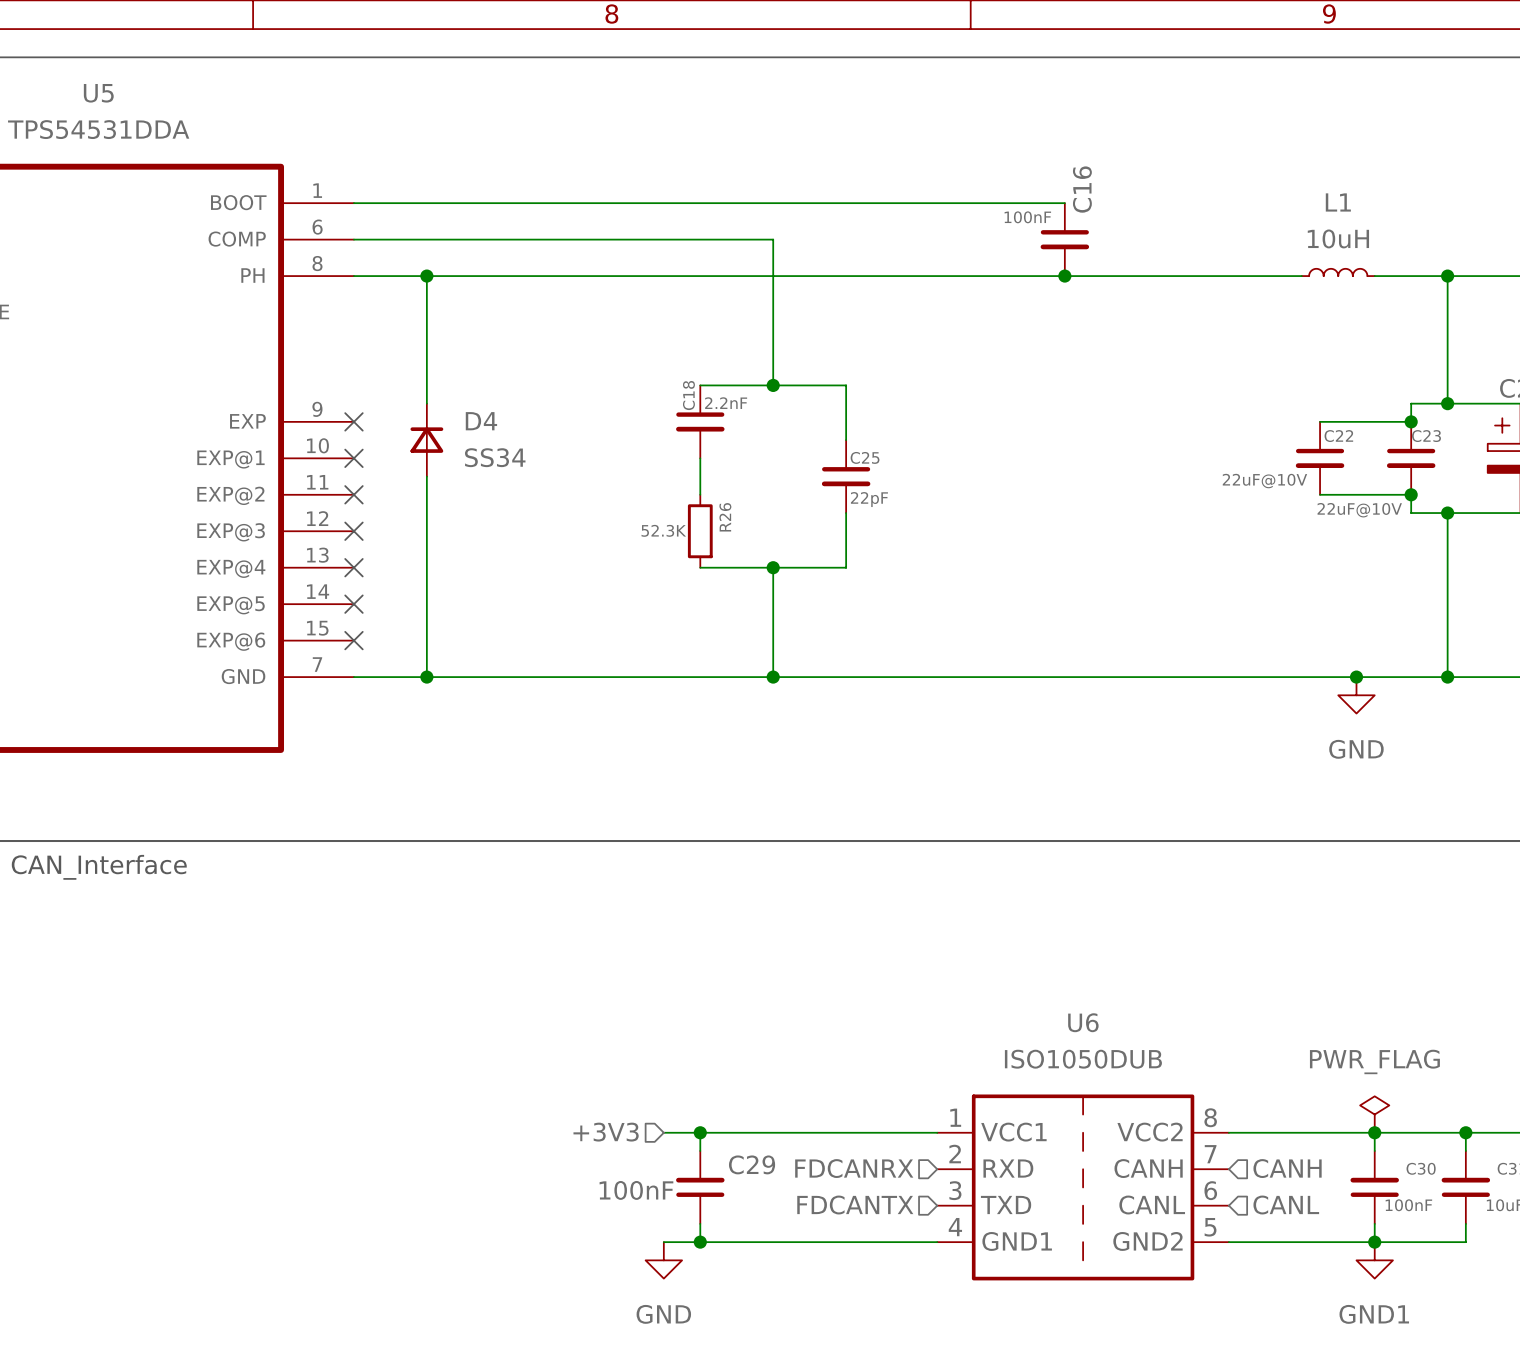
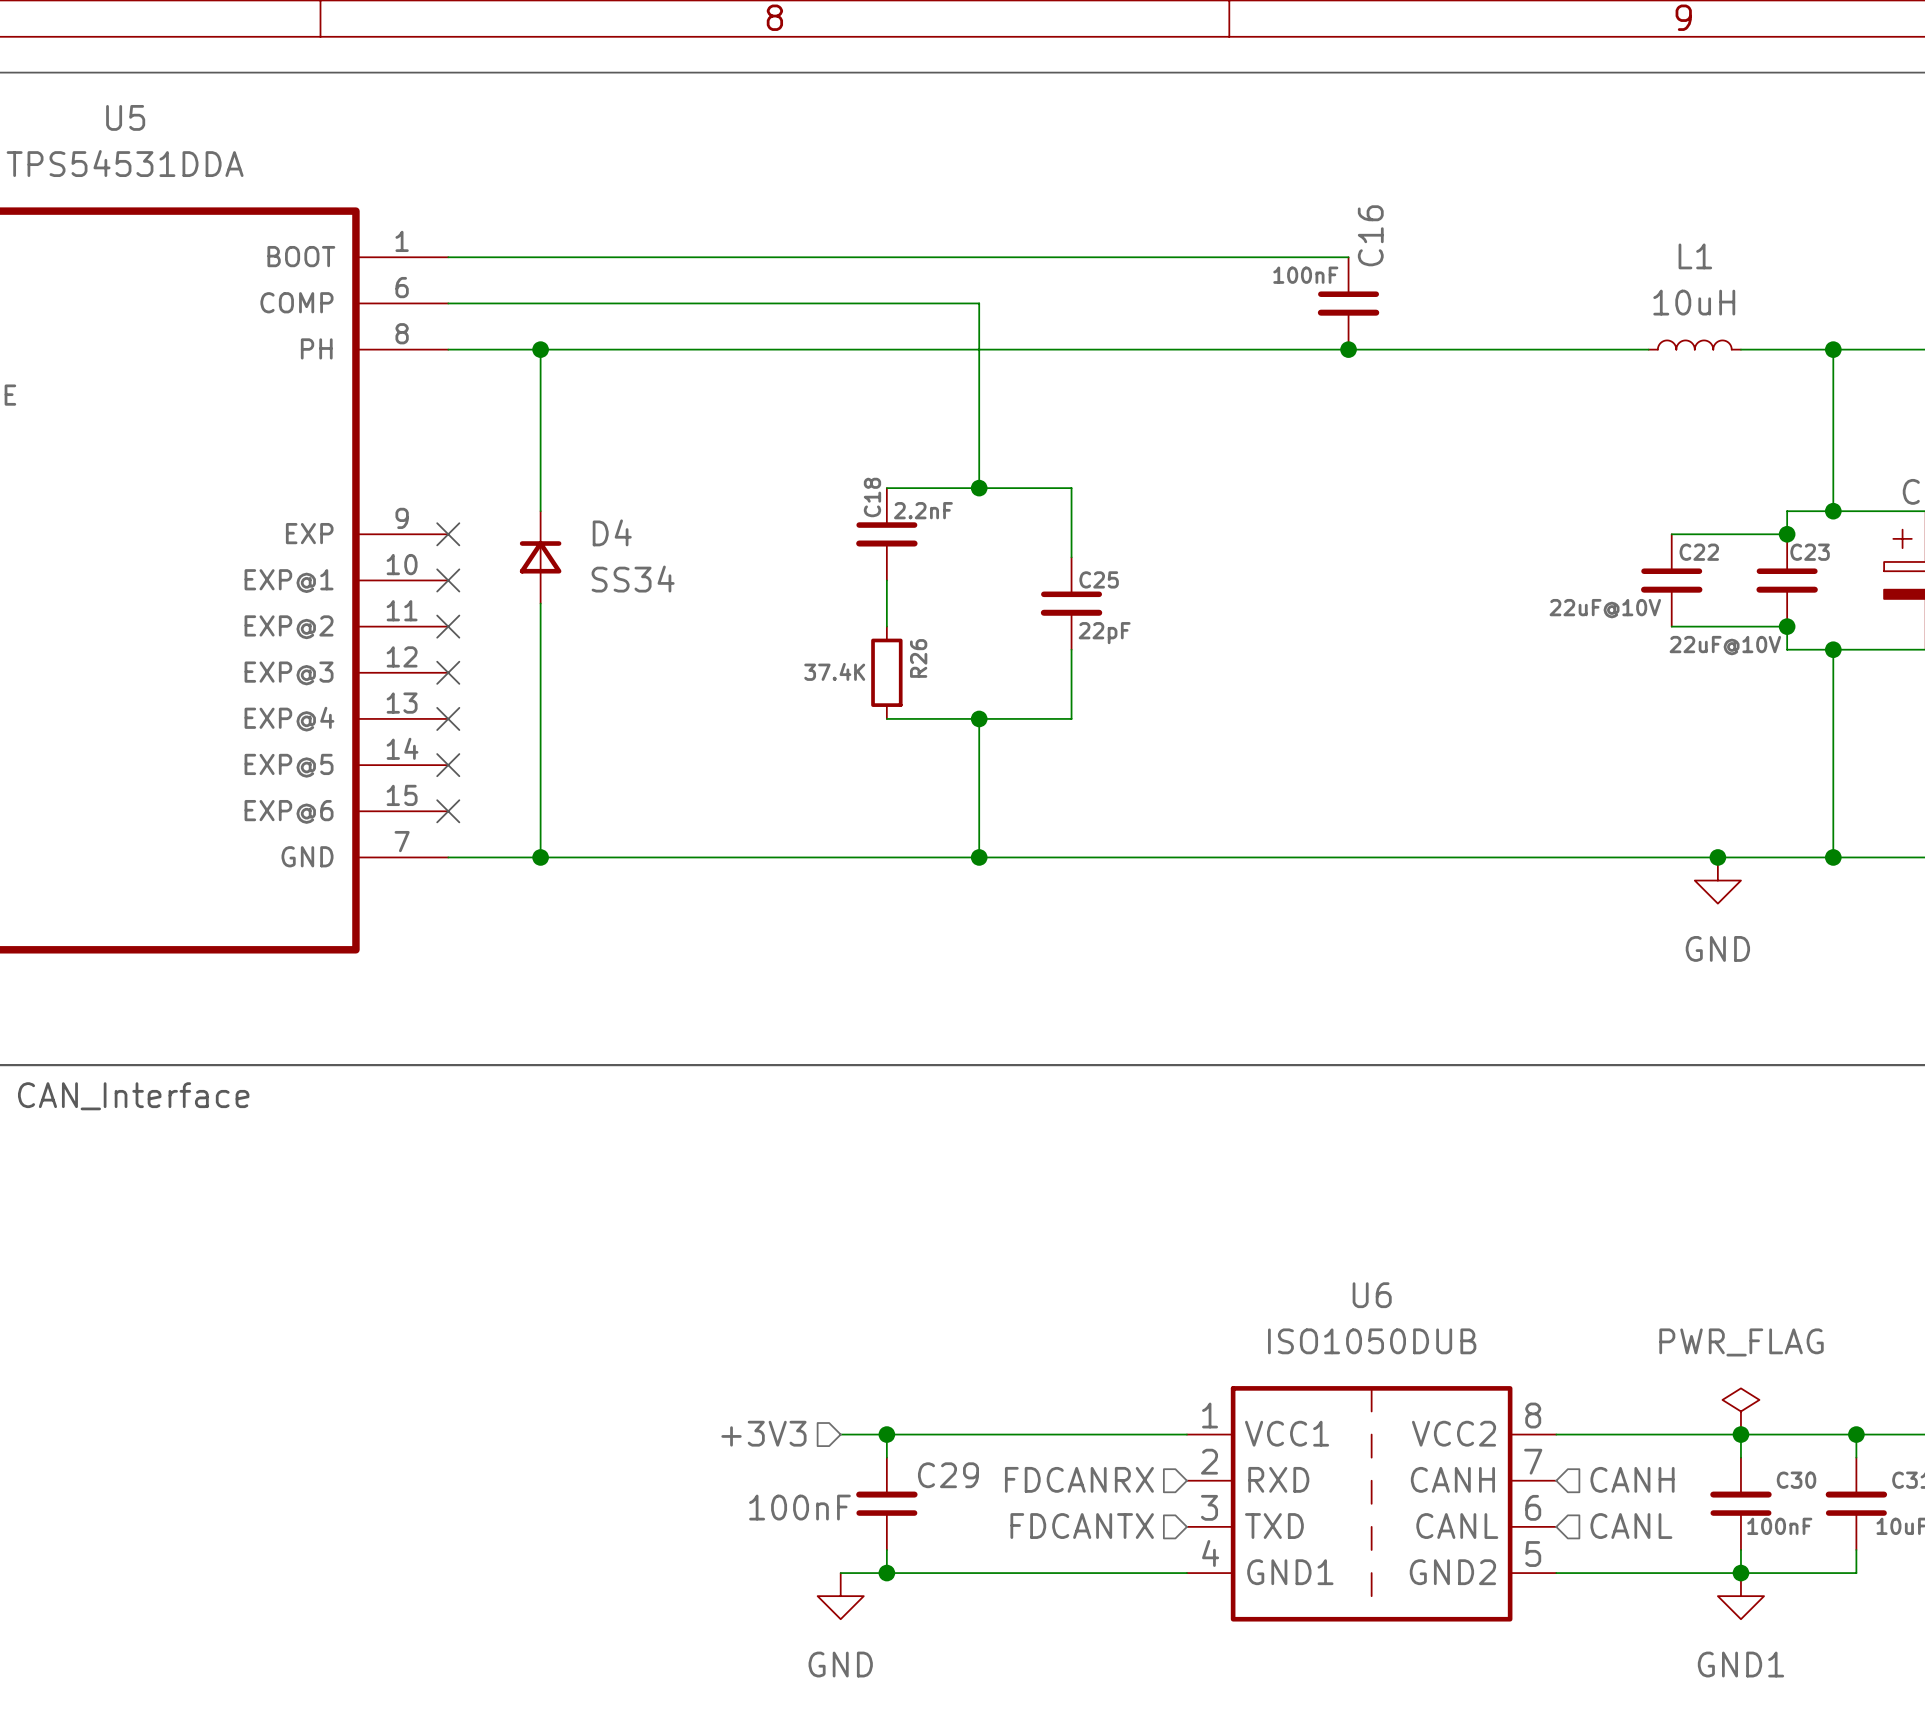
R26 value: 52.3K (663, 530) -> 37.4K (834, 671)

